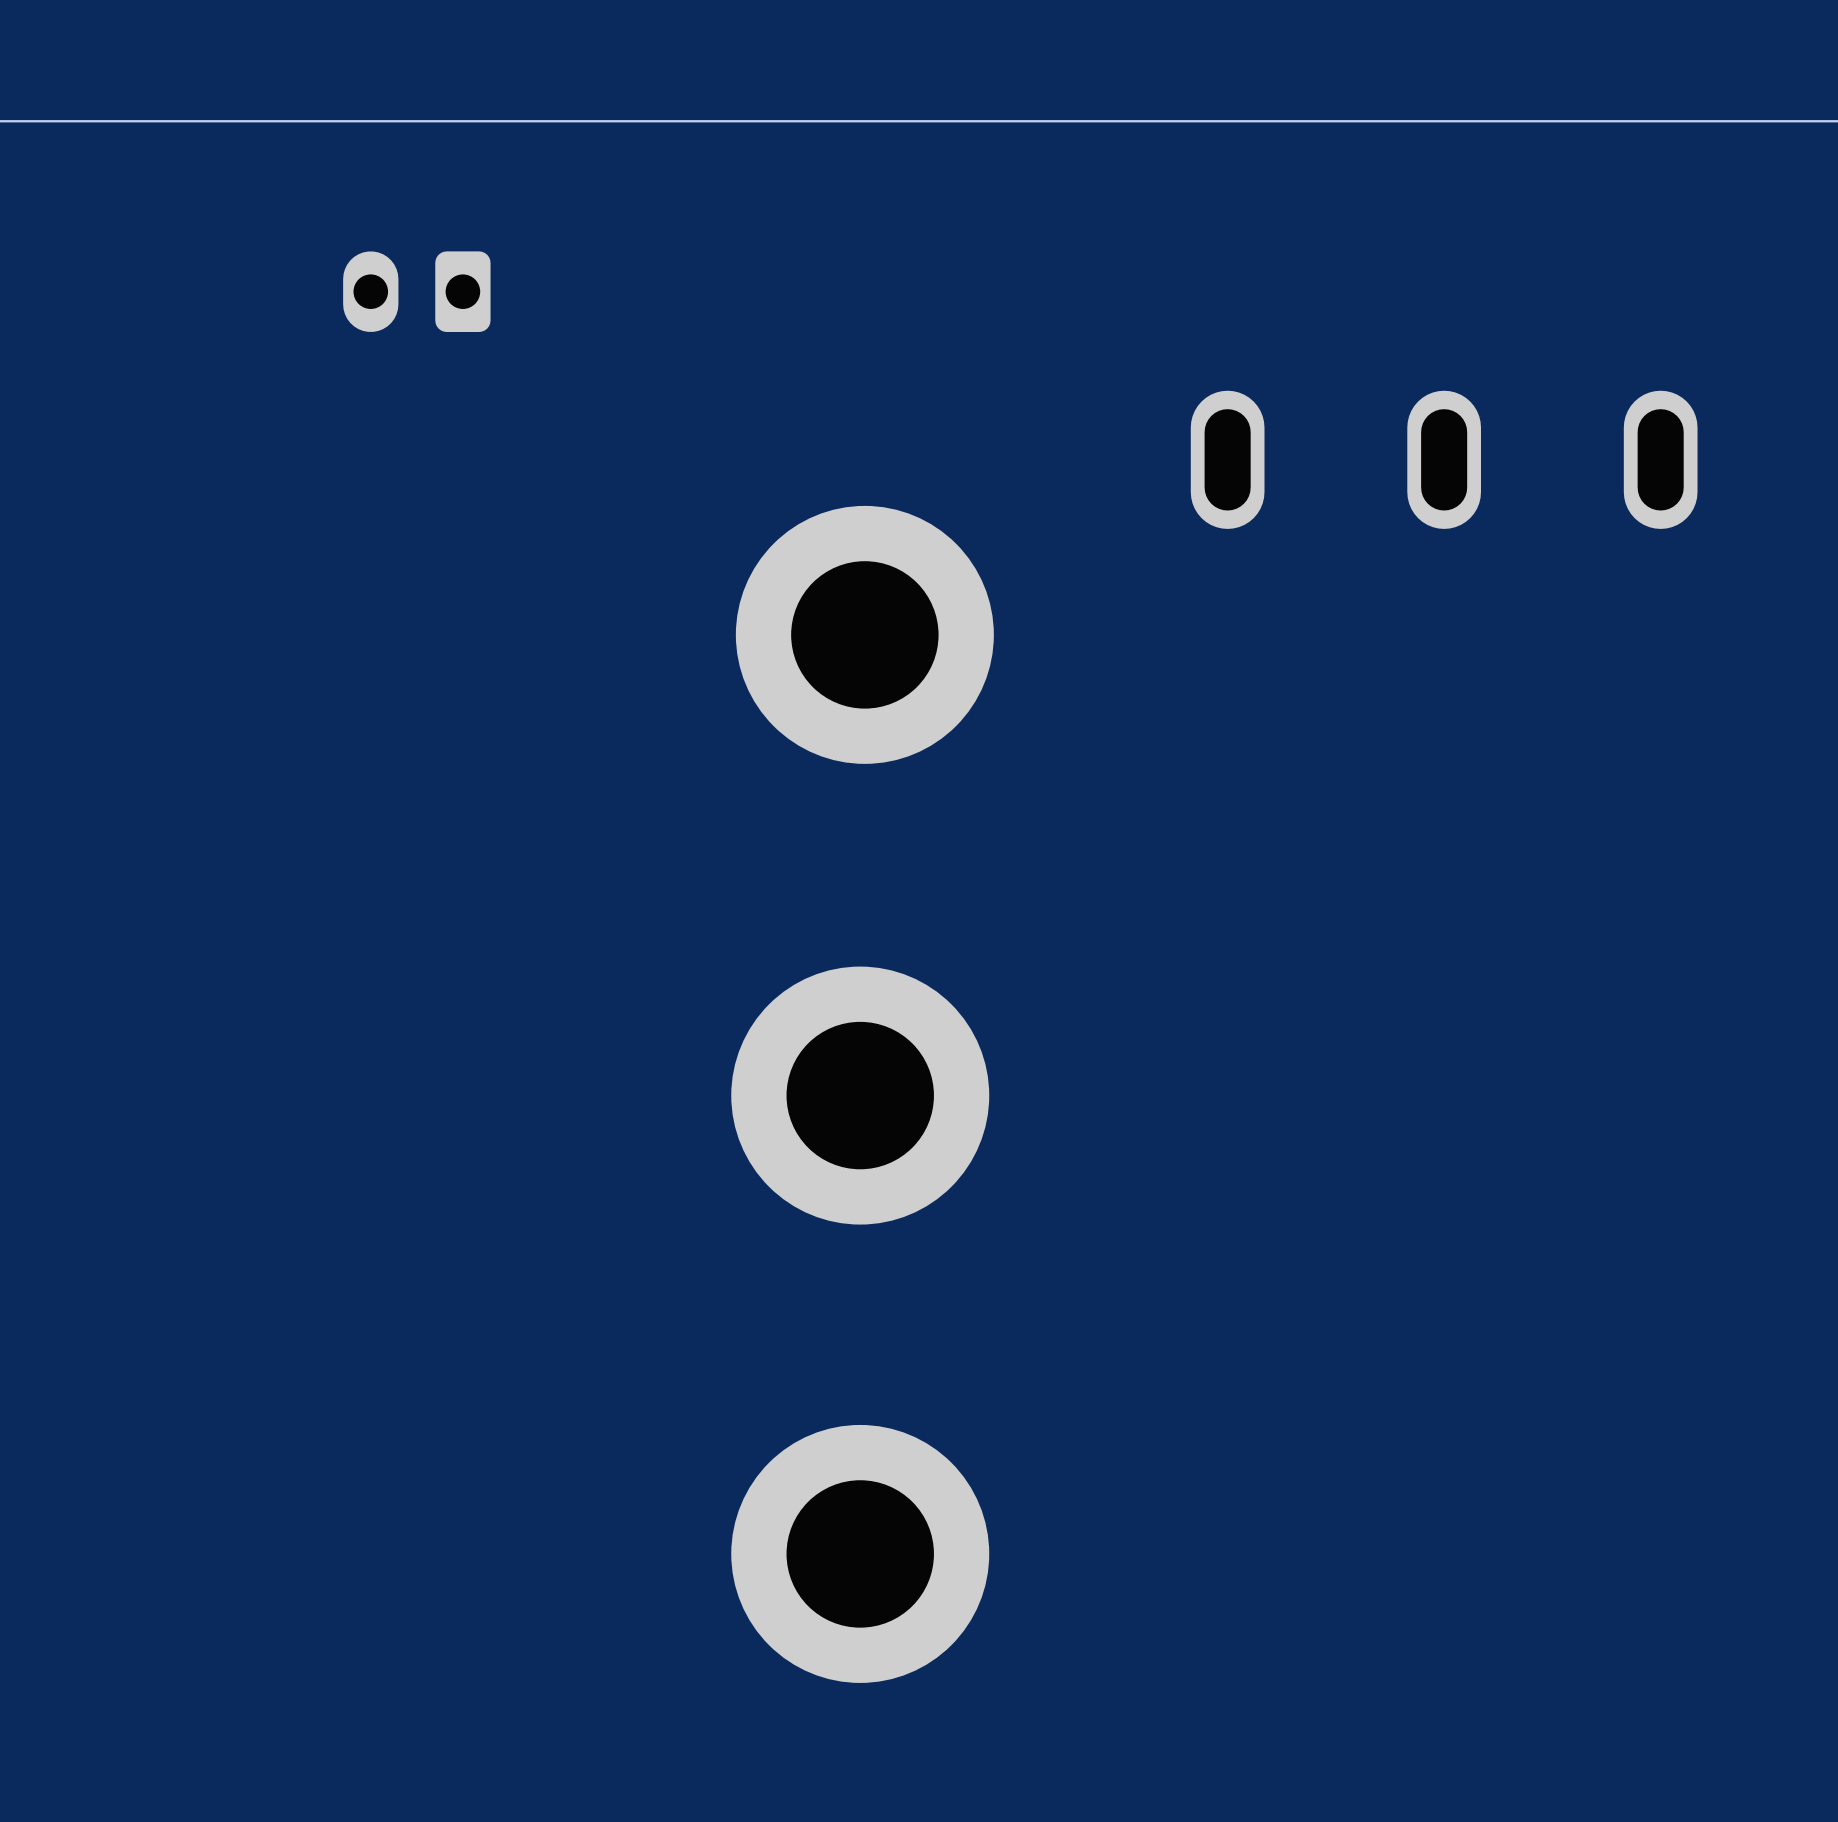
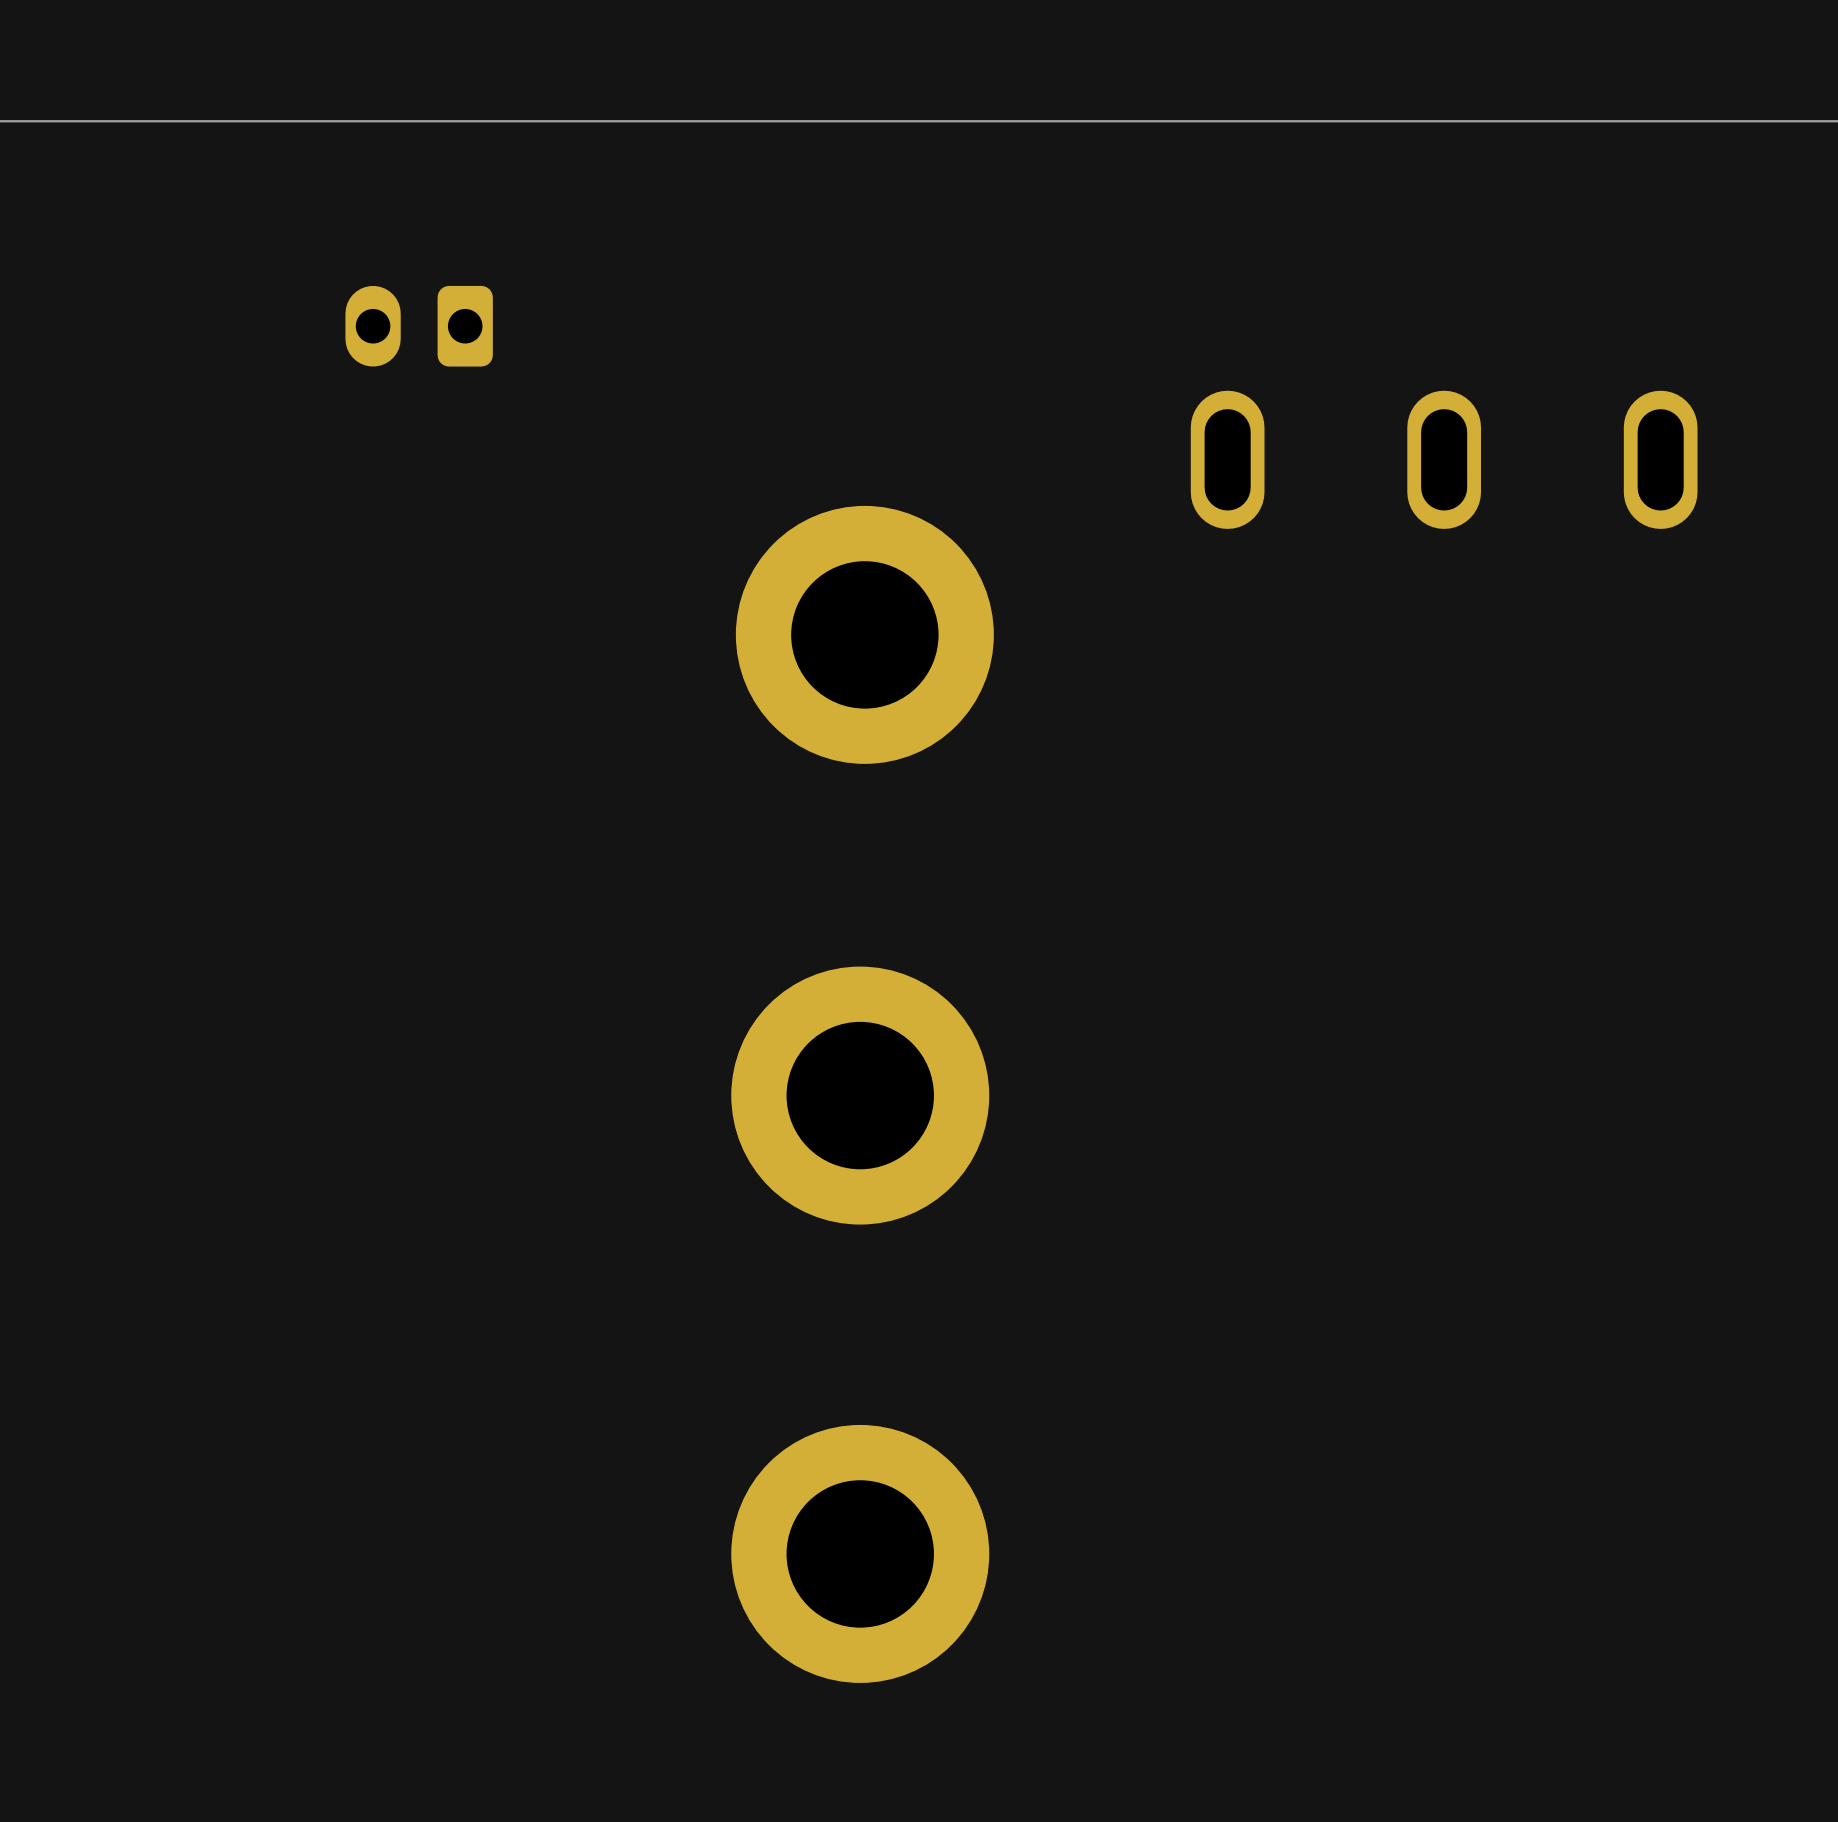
part position: (416, 291) -> (419, 326)

